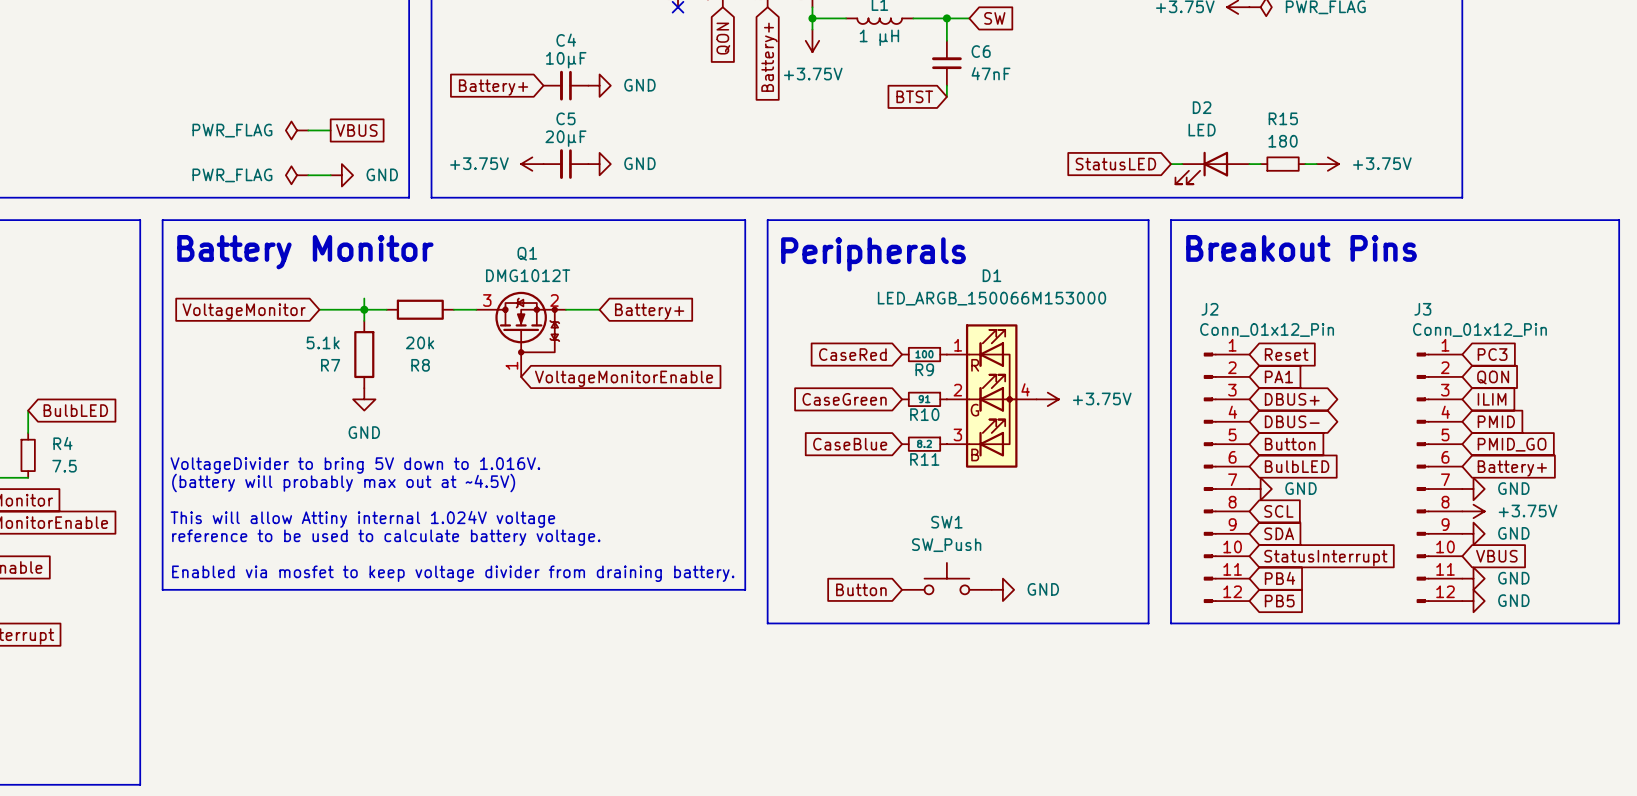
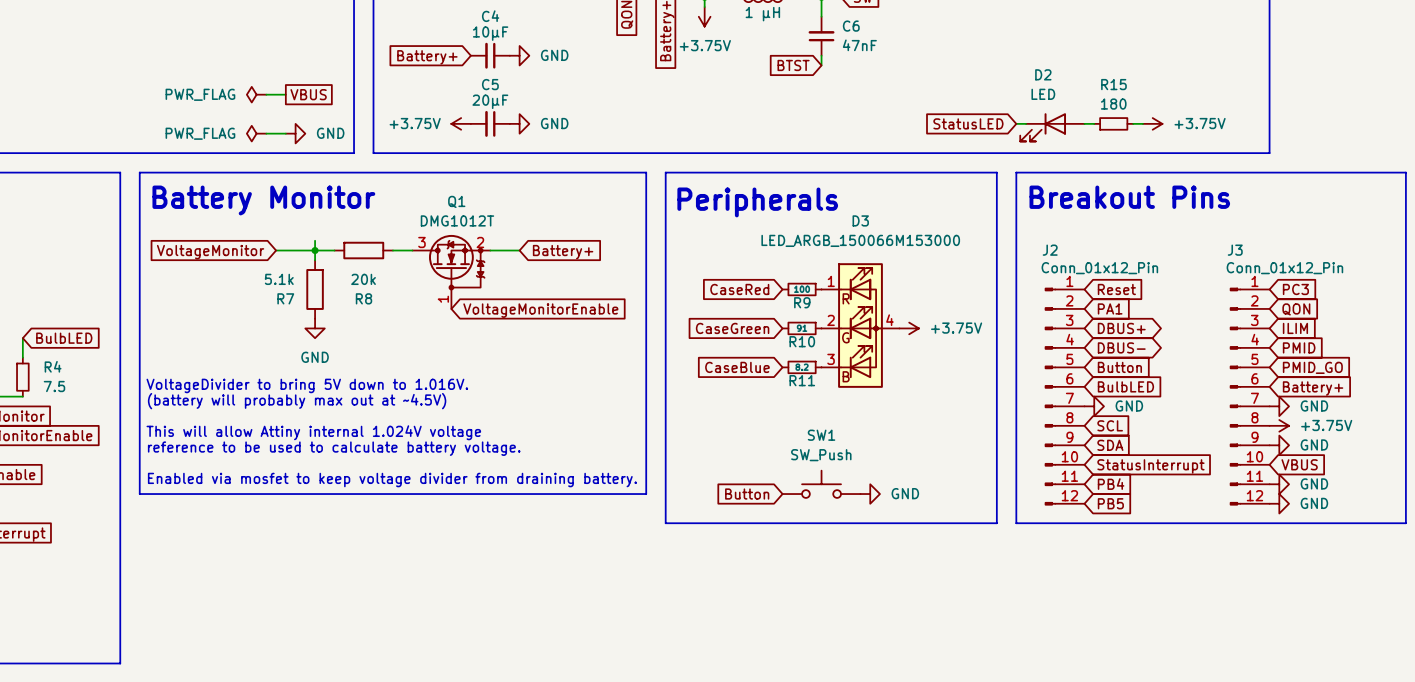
D1 name: D1 (991, 275) -> D3 (860, 220)

